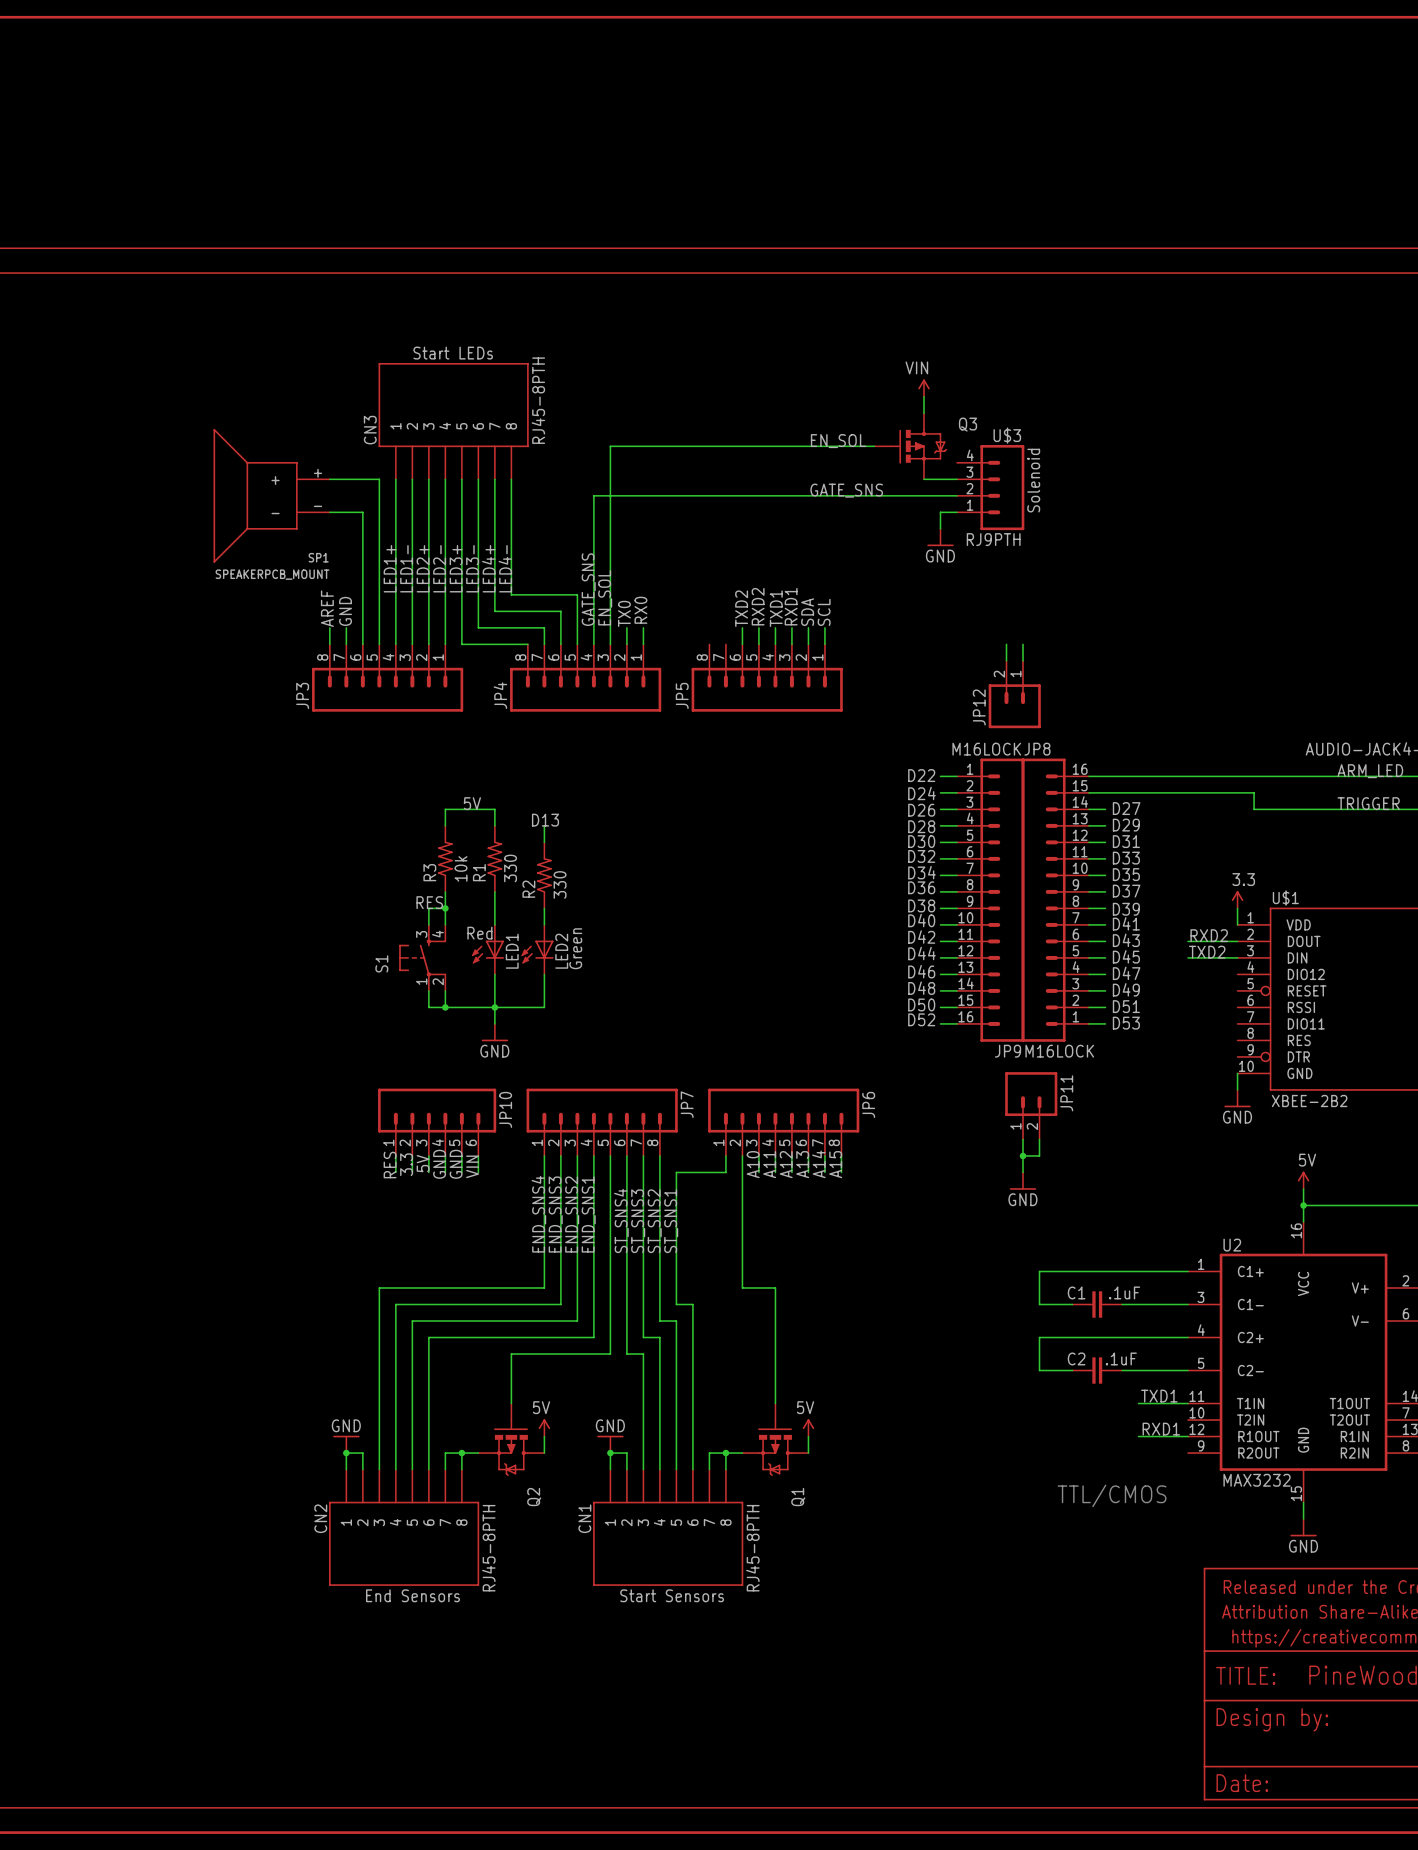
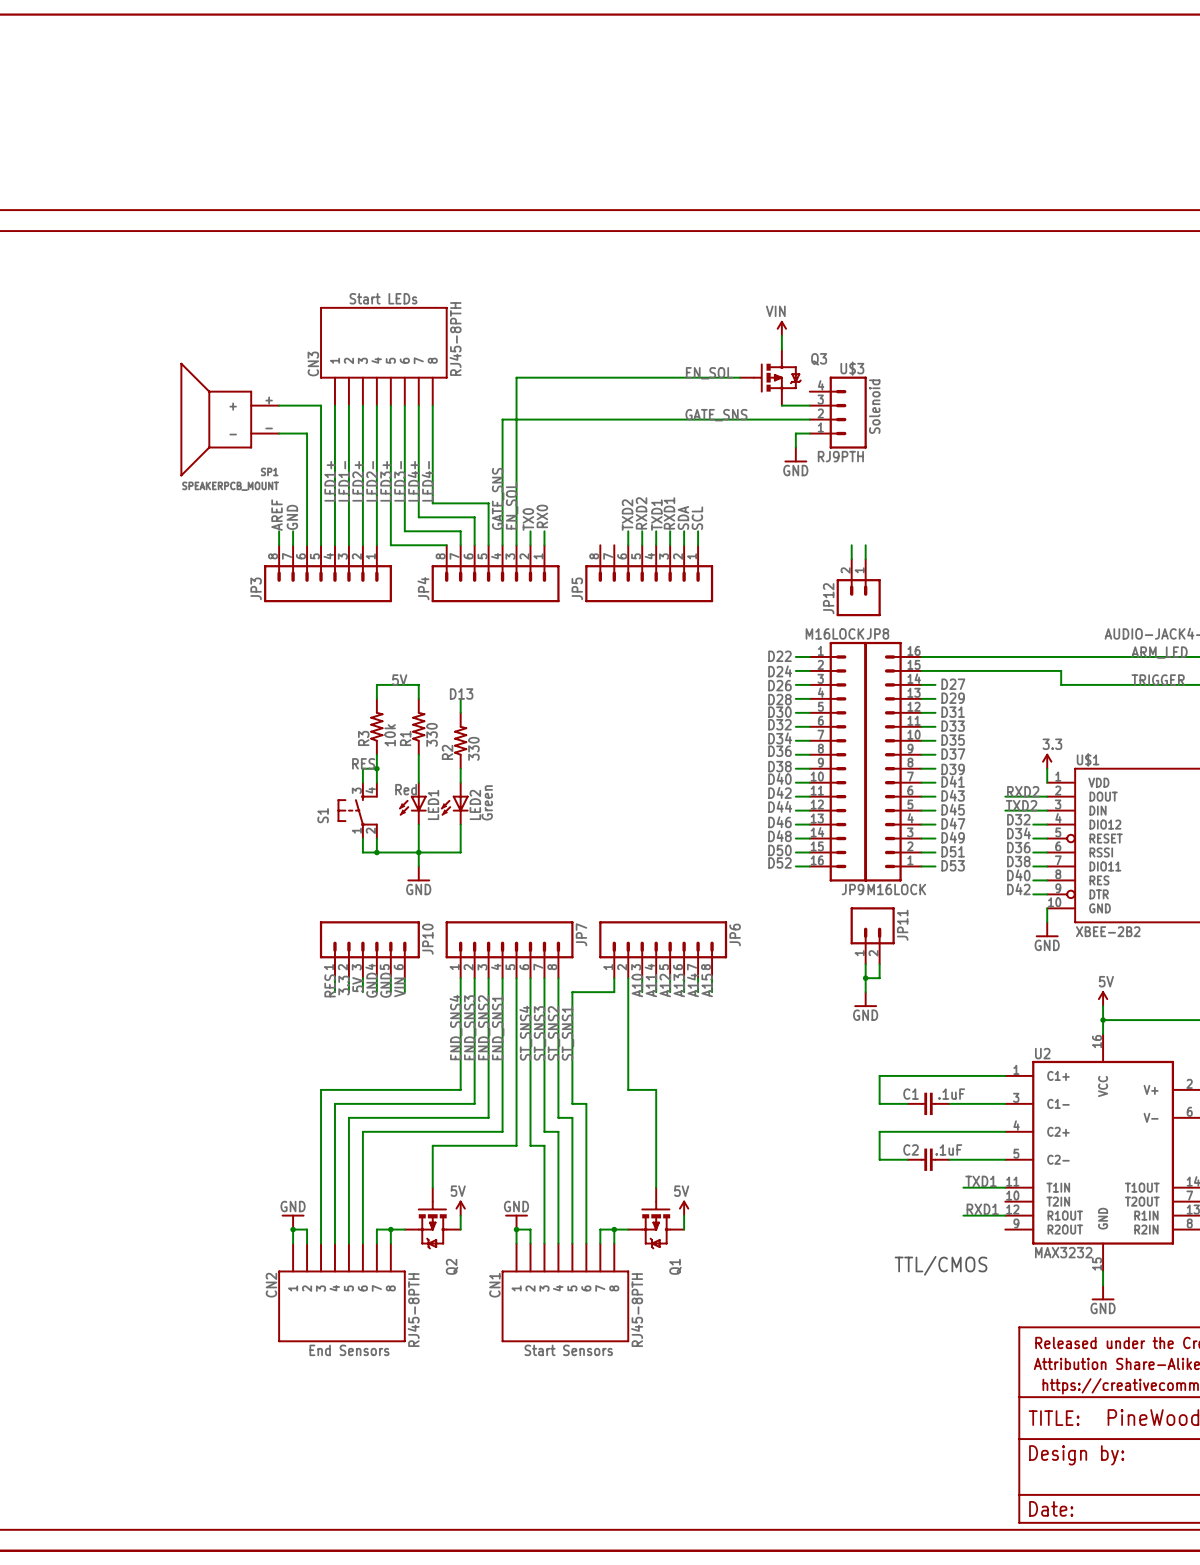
label: none -> D32 (1018, 819)
wire: none -> (1033, 824) (1047, 824)
label: none -> D34 (1019, 833)
wire: none -> (1033, 838) (1047, 838)
label: none -> D36 (1018, 847)
wire: none -> (1033, 852) (1047, 852)
label: none -> D38 (1018, 861)
wire: none -> (1033, 866) (1047, 866)
label: none -> D40 (1018, 875)
wire: none -> (1033, 880) (1047, 880)
label: none -> D42 (1018, 889)
wire: none -> (1033, 894) (1047, 894)

